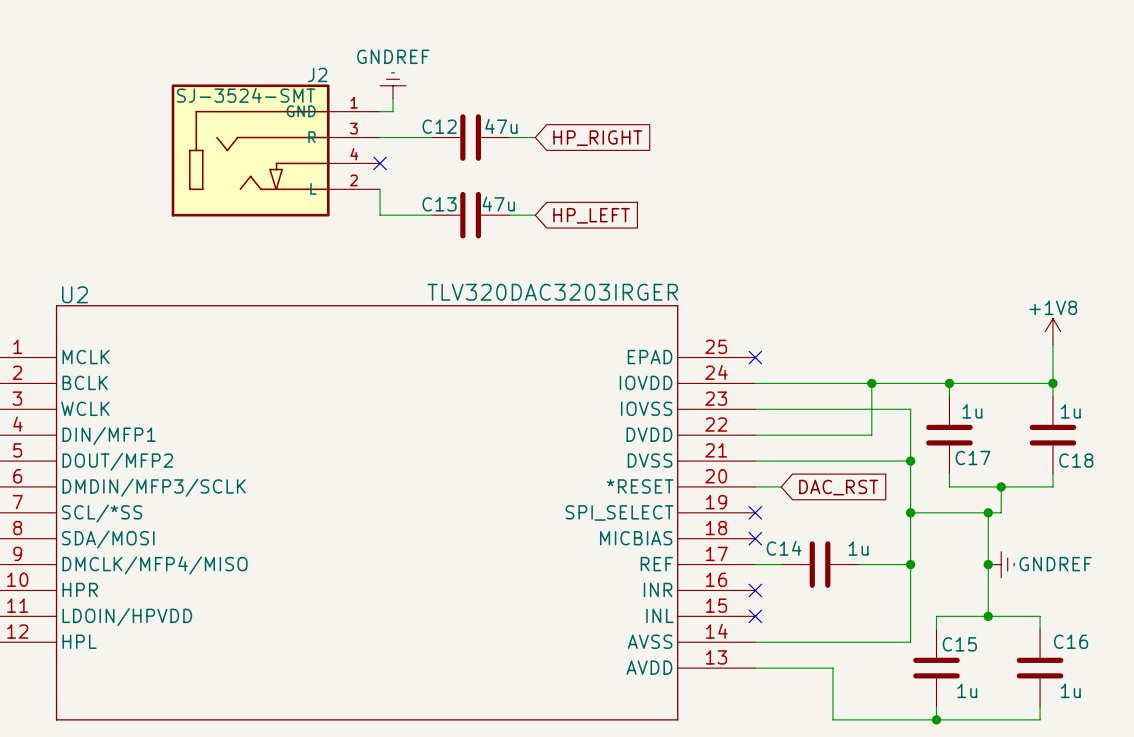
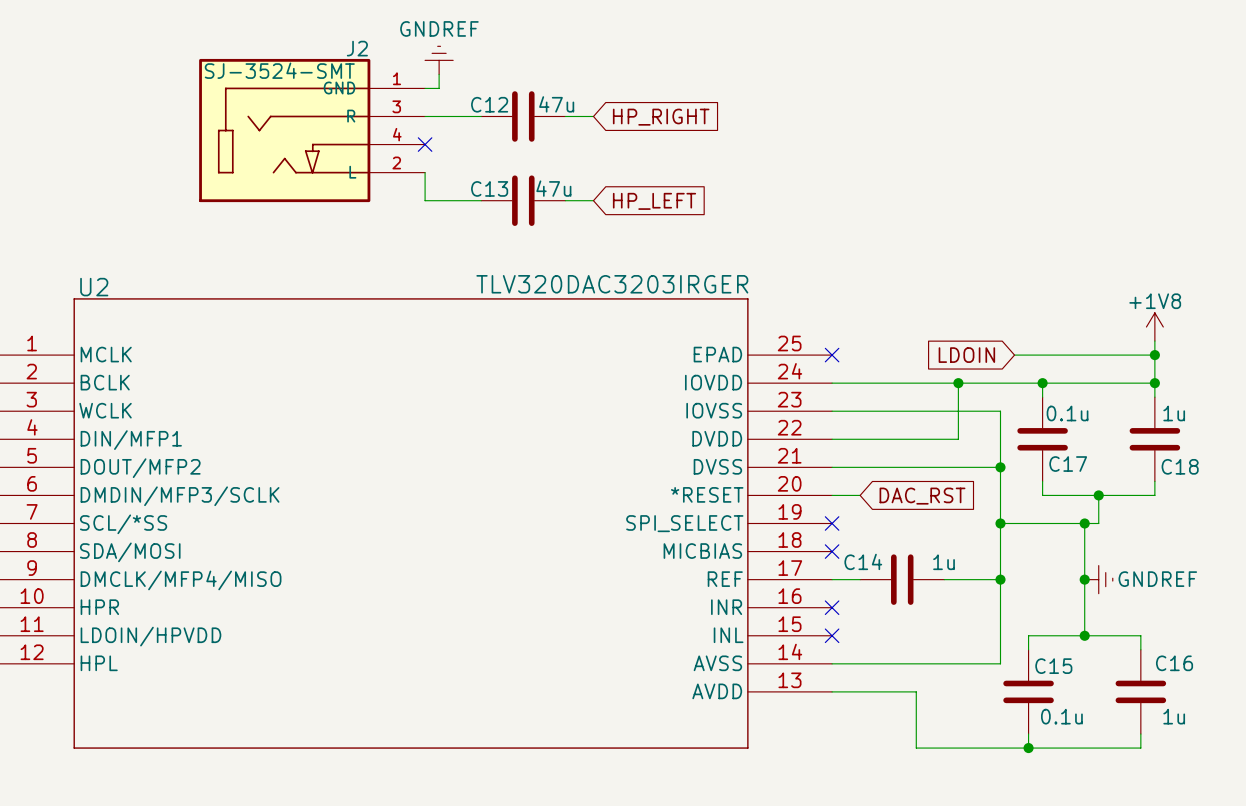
global label: none -> LDOIN (966, 355)
wire: none -> (1014, 355) (1154, 355)
junction: none -> (1154, 355)
C17 value: 1u (972, 411) -> 0.1u (1067, 413)
C15 value: 1u (967, 690) -> 0.1u (1061, 716)

